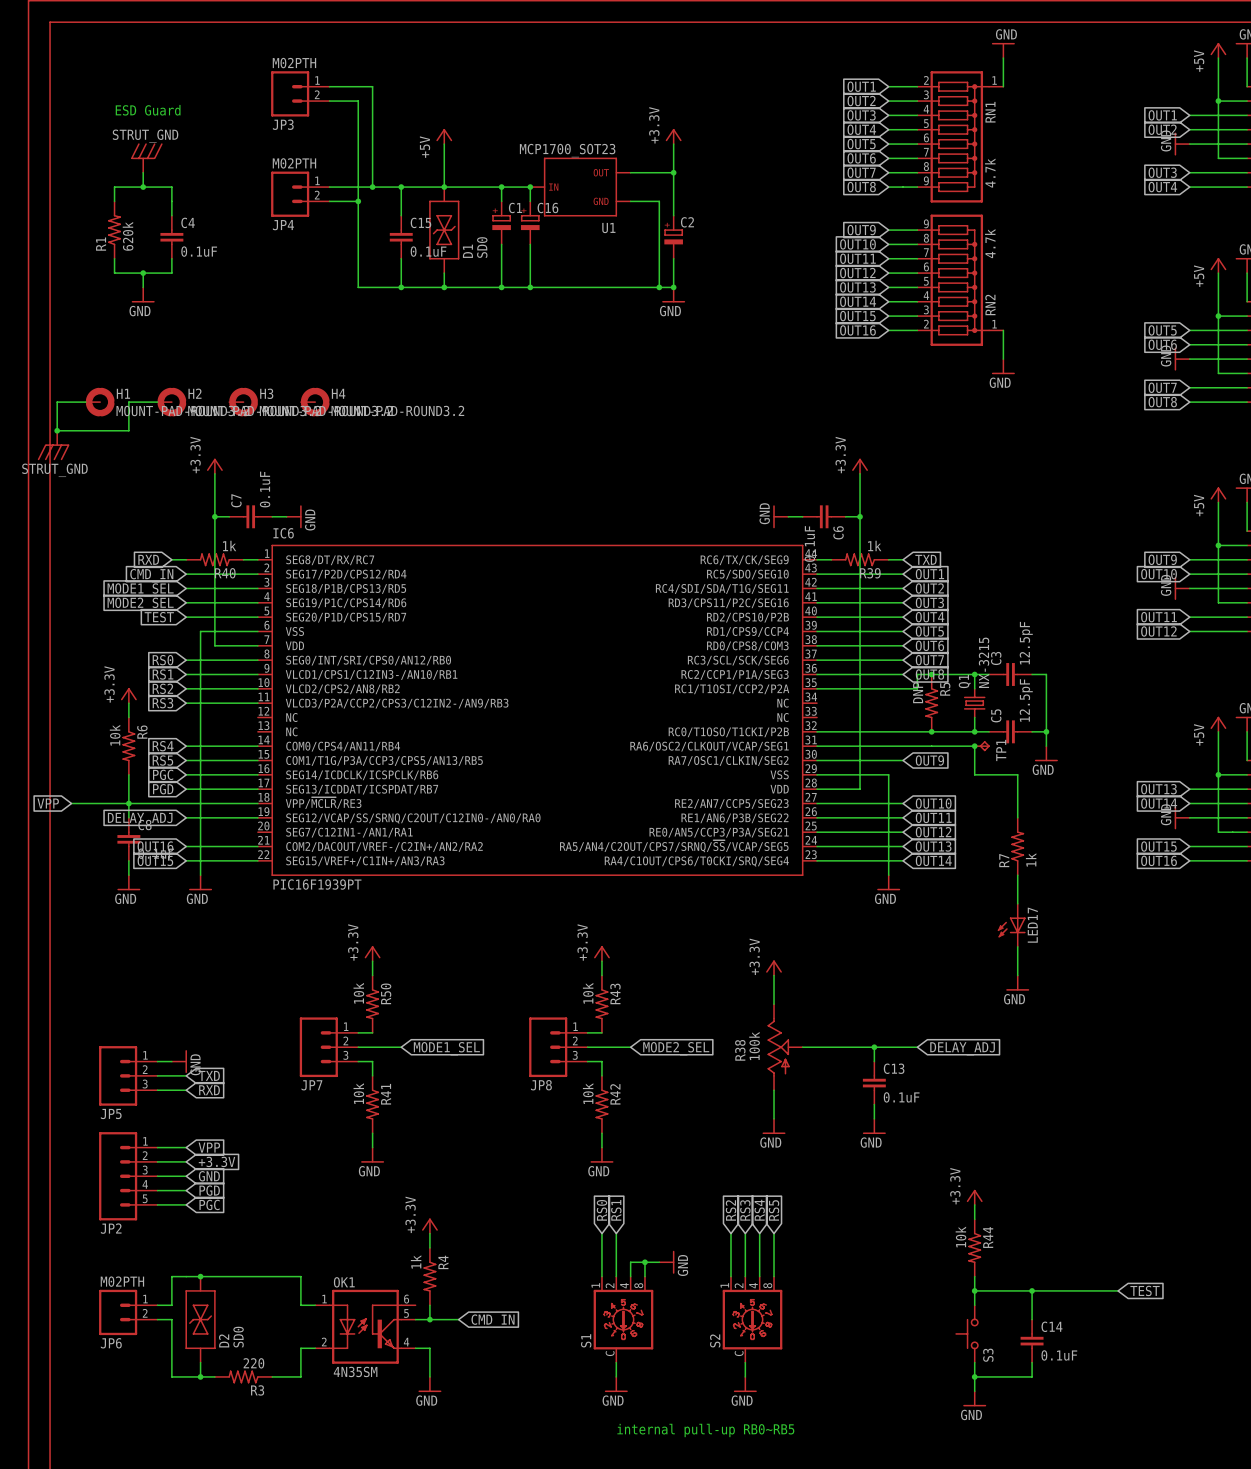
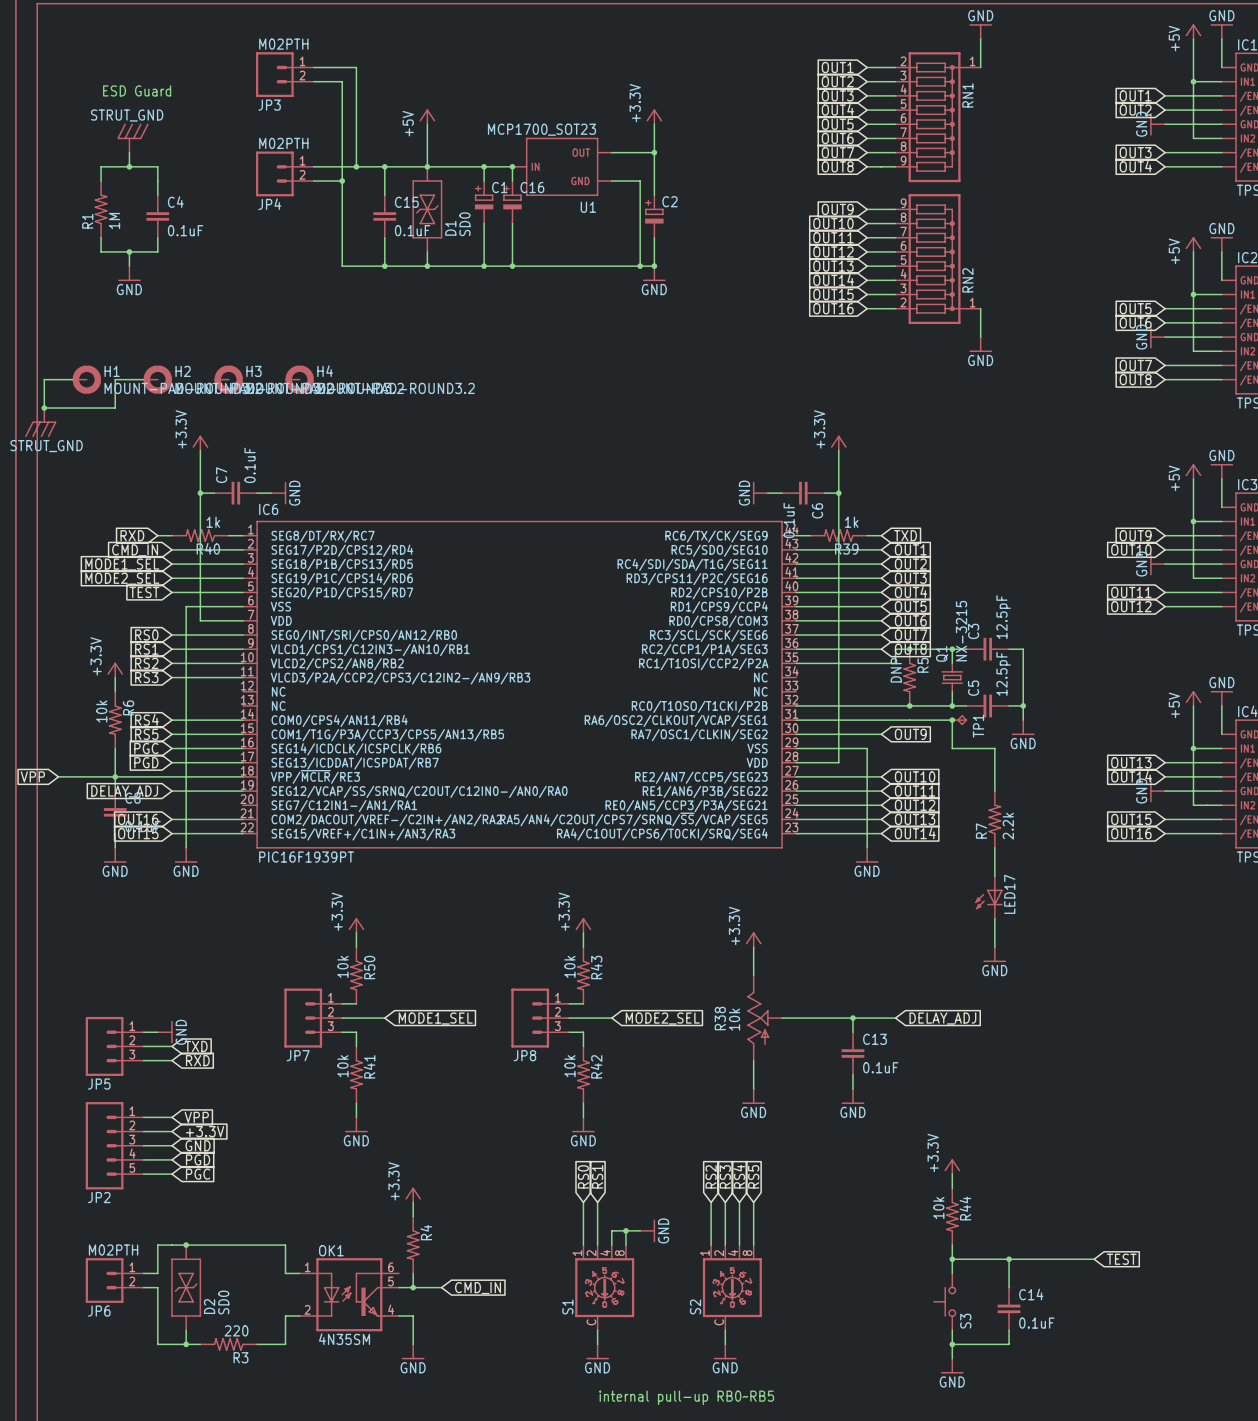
RN1 value: 4.7k (990, 173) -> none
R1 value: 620k (128, 236) -> 1M (114, 221)
RN2 value: 4.7k (990, 243) -> none
R7 value: 1k (1031, 859) -> 2.2k (1008, 826)
R38 value: 100k (754, 1046) -> 10k (734, 1019)
R4 value: 1k (416, 1261) -> none

